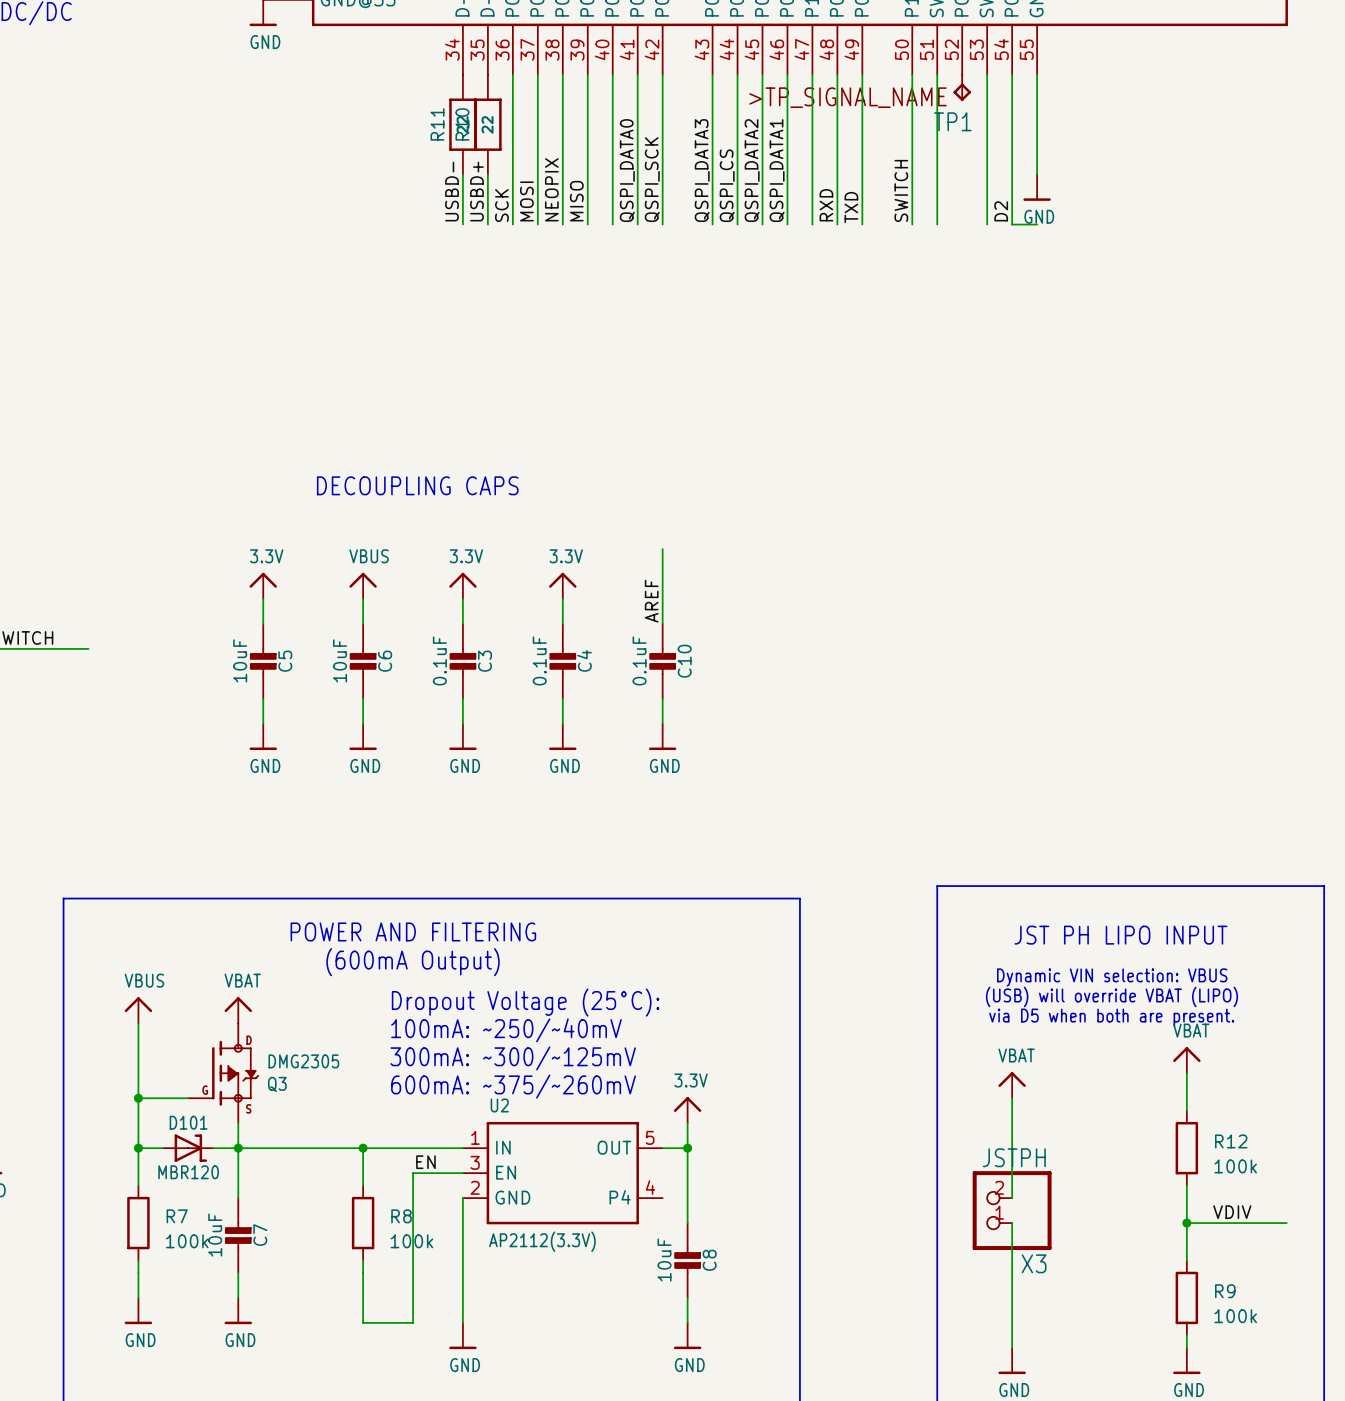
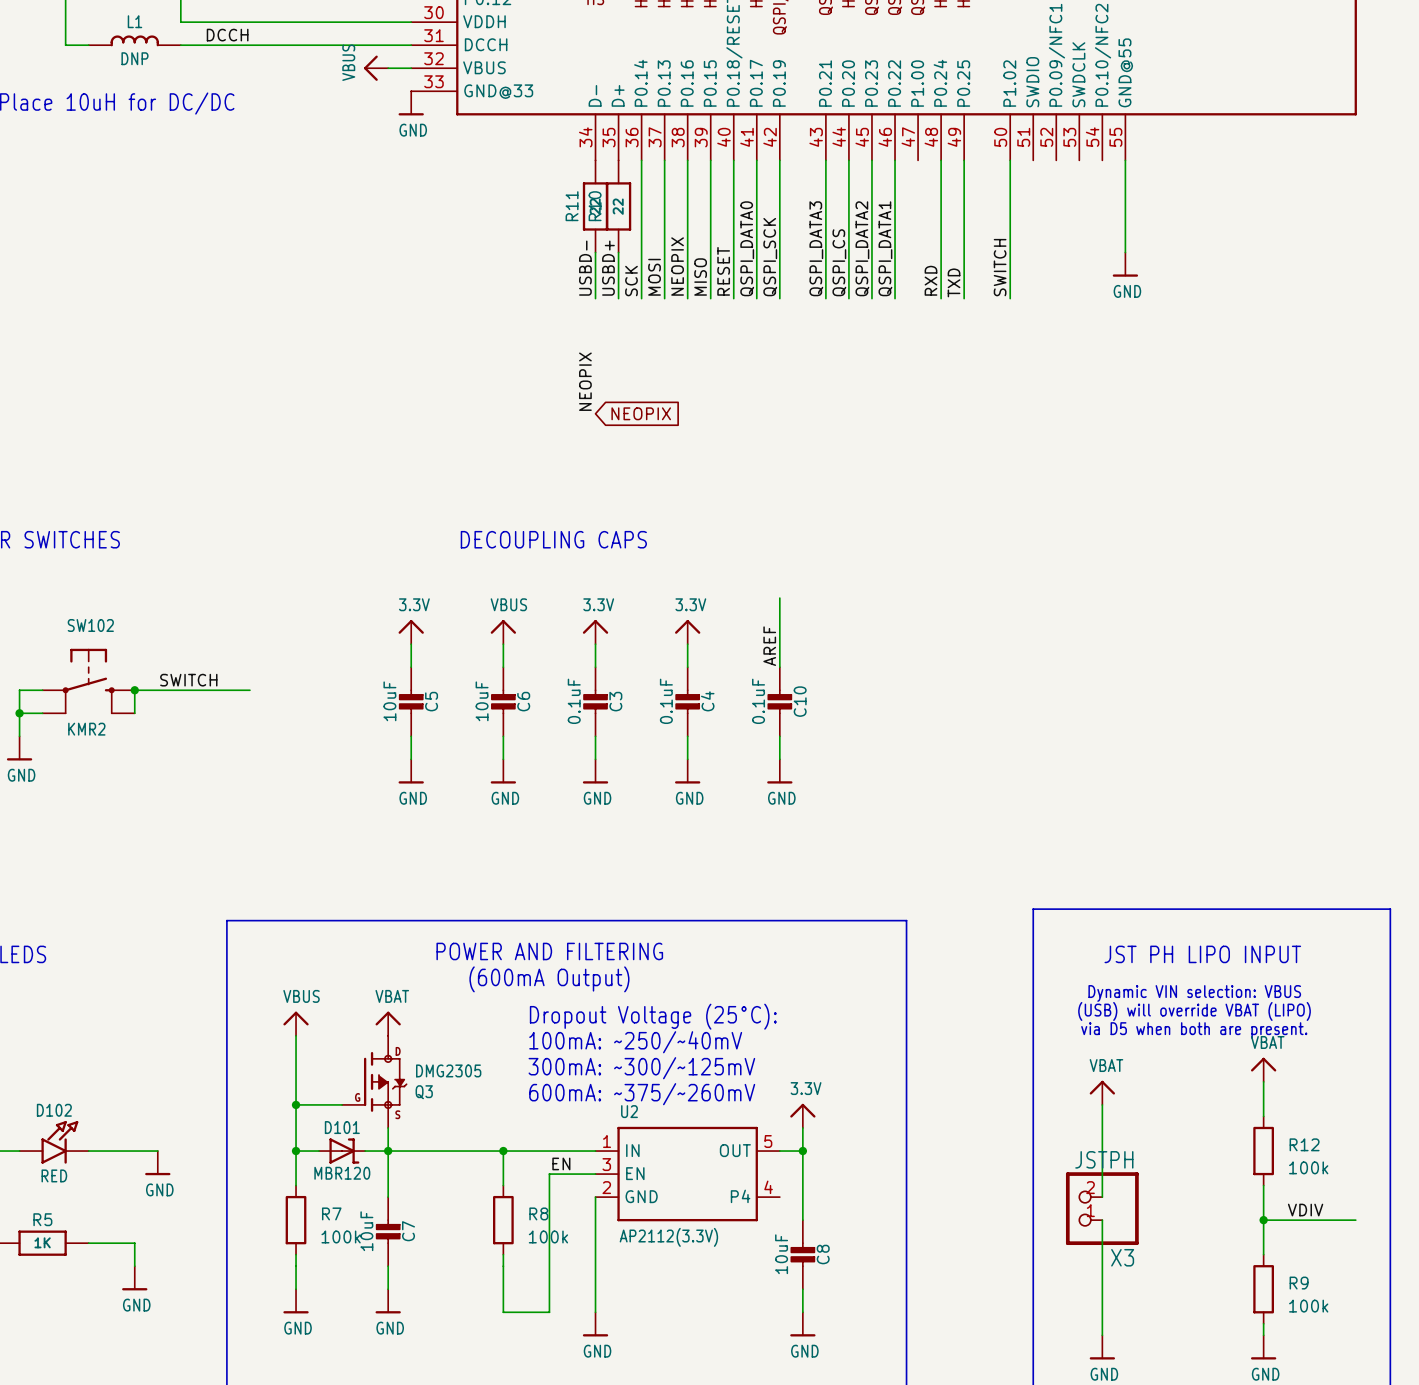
wire: (812, 74) (812, 224) -> none
wire: (937, 74) (937, 224) -> none
wire: (987, 74) (987, 224) -> none
wire: (1012, 74) (1012, 224) (1037, 224) -> none
TP1: (962, 87) -> none
label: none -> RESET (723, 271)
label: D2 (1001, 211) -> none
label: none -> NEOPIX (585, 381)
global label: none -> NEOPIX (641, 413)

